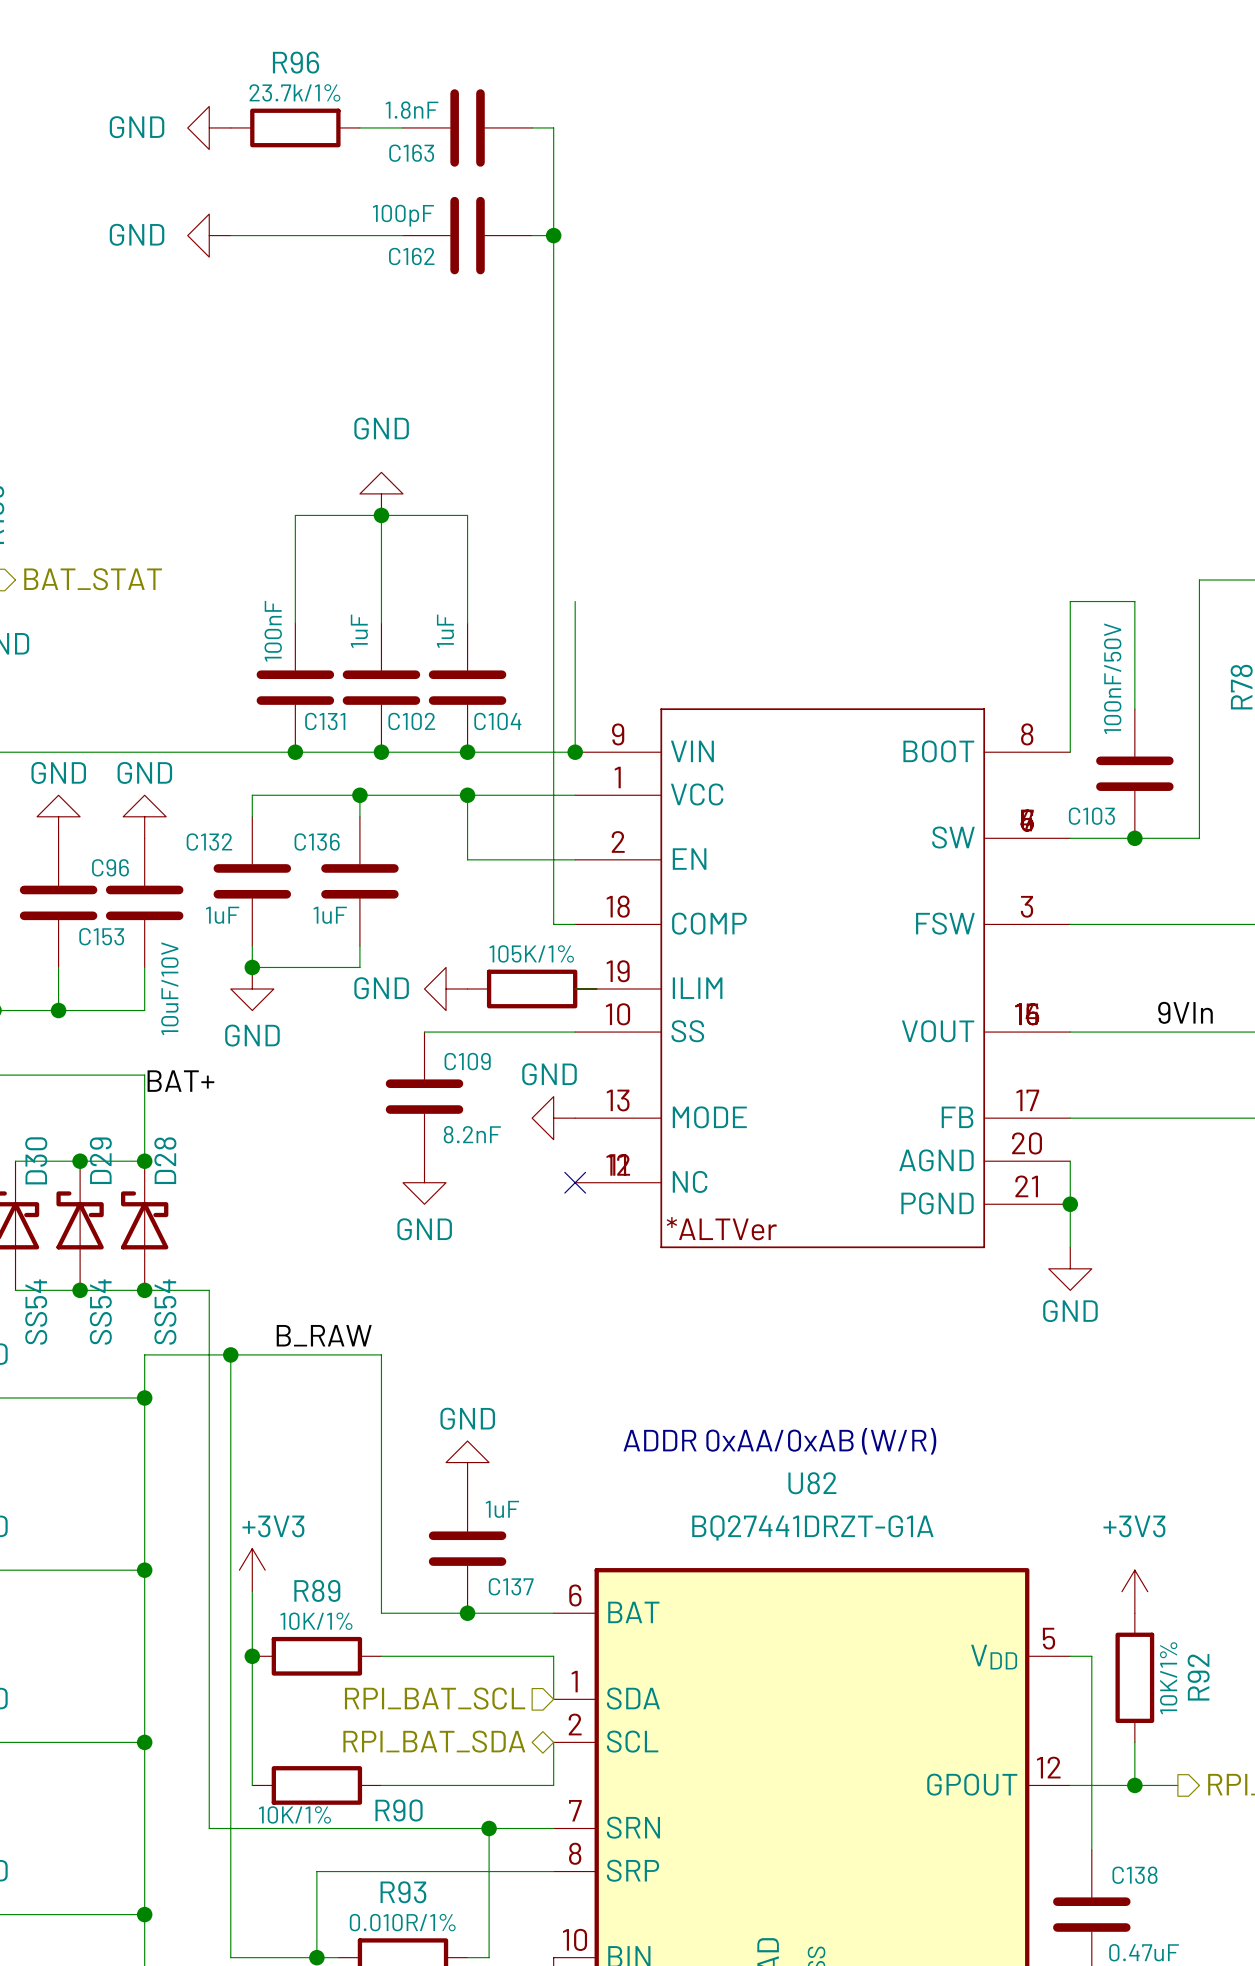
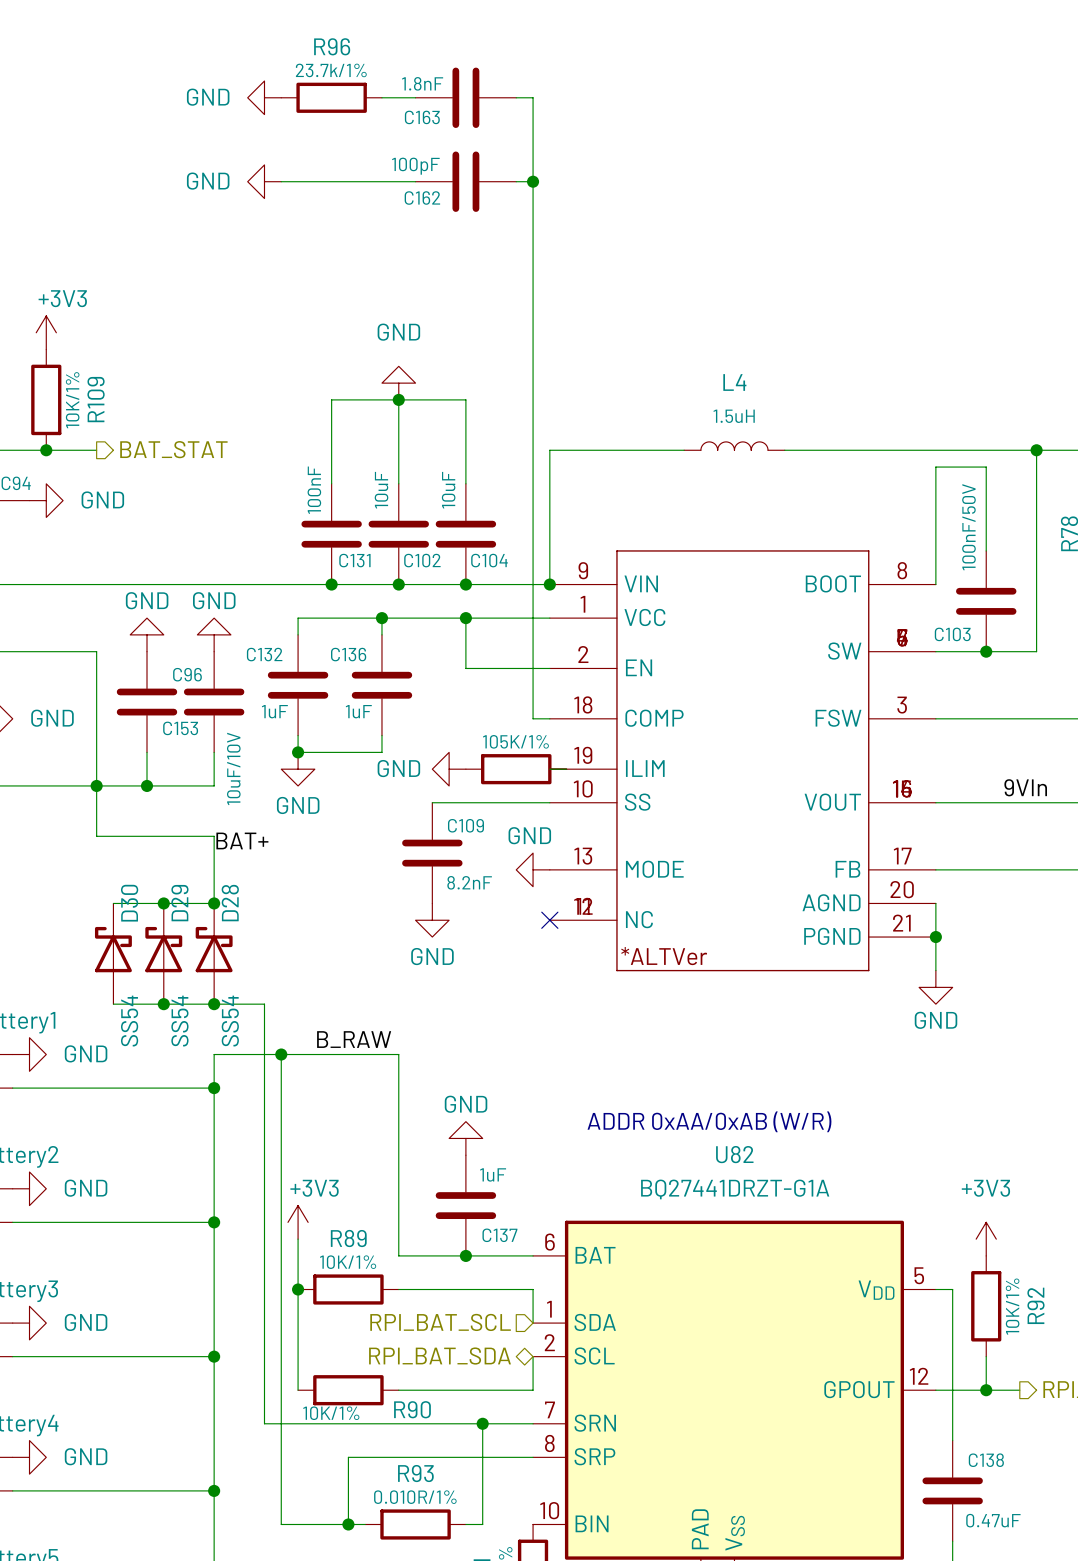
L4: none -> 1.5uH (734, 446)
wire: none -> (684, 450) (549, 450) (549, 467)
wire: none -> (784, 450) (1036, 450)
junction: none -> (1036, 450)
C102 value: 1uF (359, 631) -> 10uF (381, 490)
C104 value: 1uF (445, 631) -> 10uF (448, 490)

